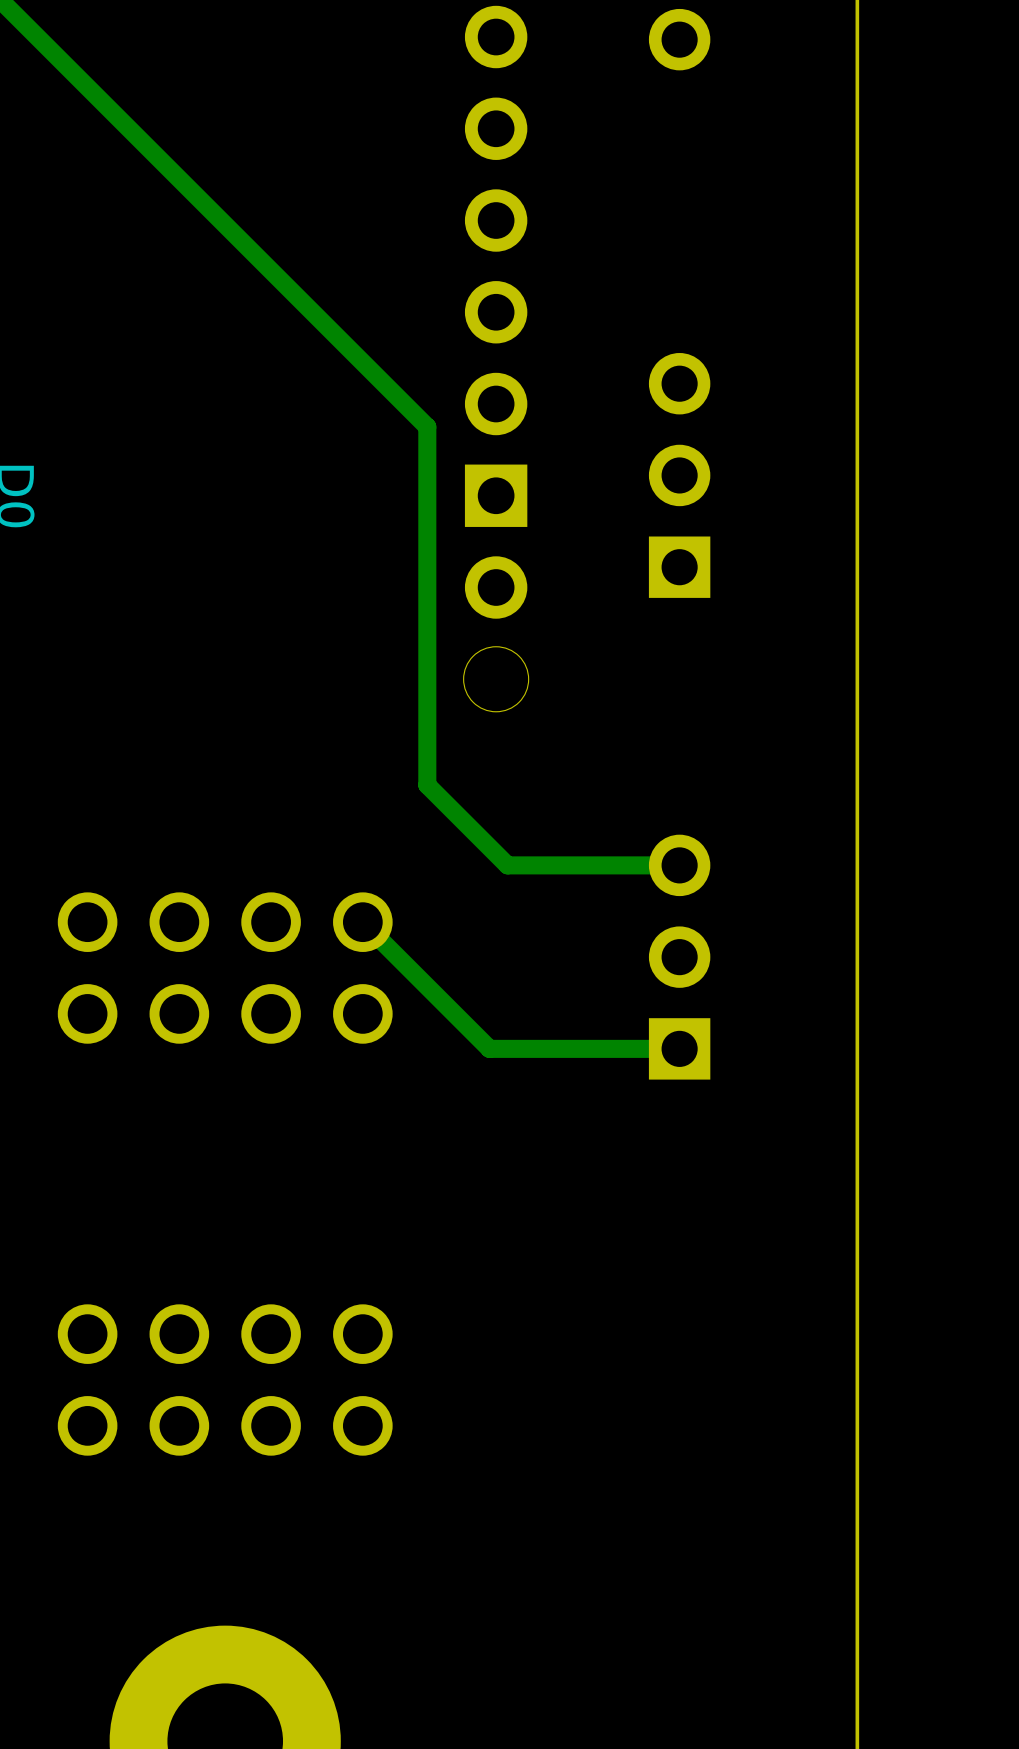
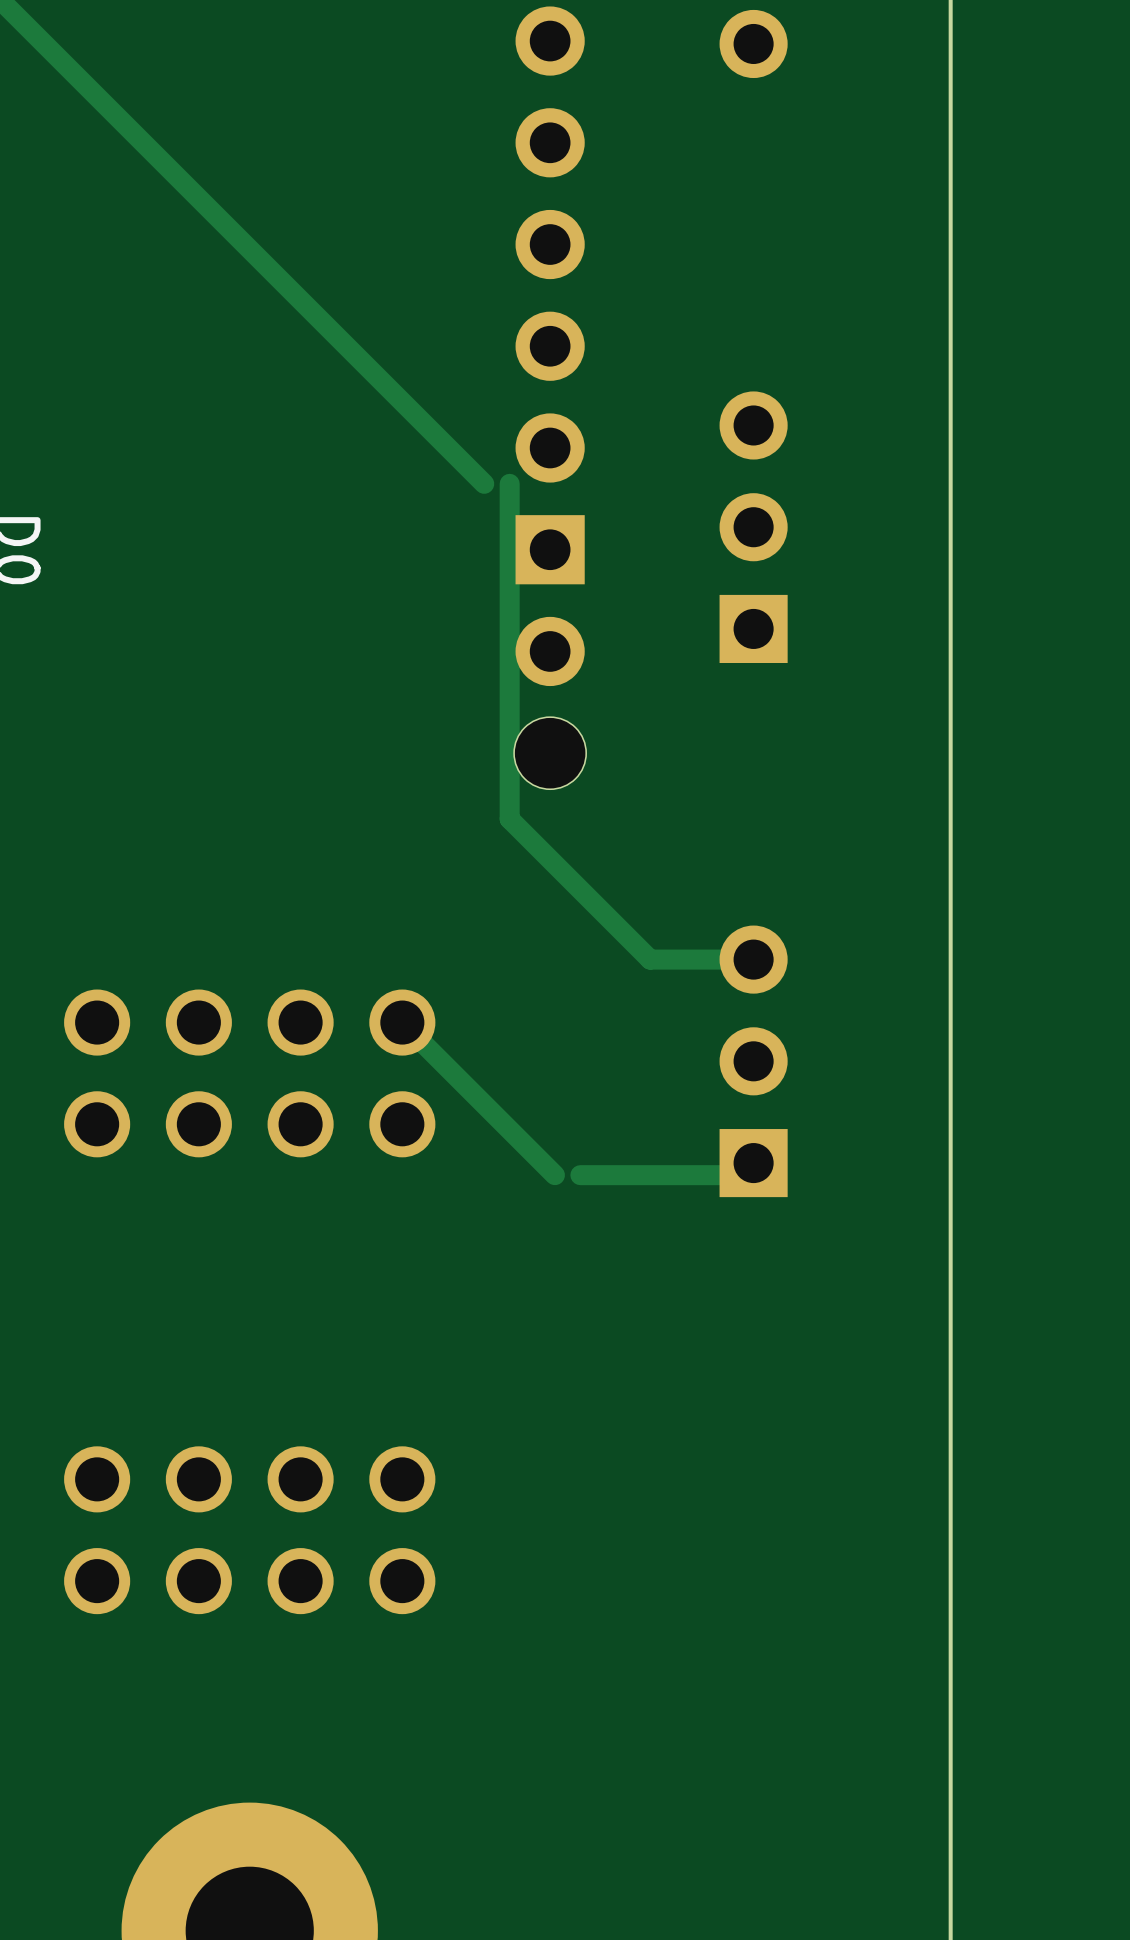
track: (427, 426) (427, 785) (507, 865) (586, 865) -> (509, 483) (509, 819) (650, 959)
track: none -> (473, 473) (484, 483)
track: none -> (542, 1163) (554, 1175)
track: (679, 1048) (489, 1048) -> (753, 1163) (741, 1175) (580, 1175)

